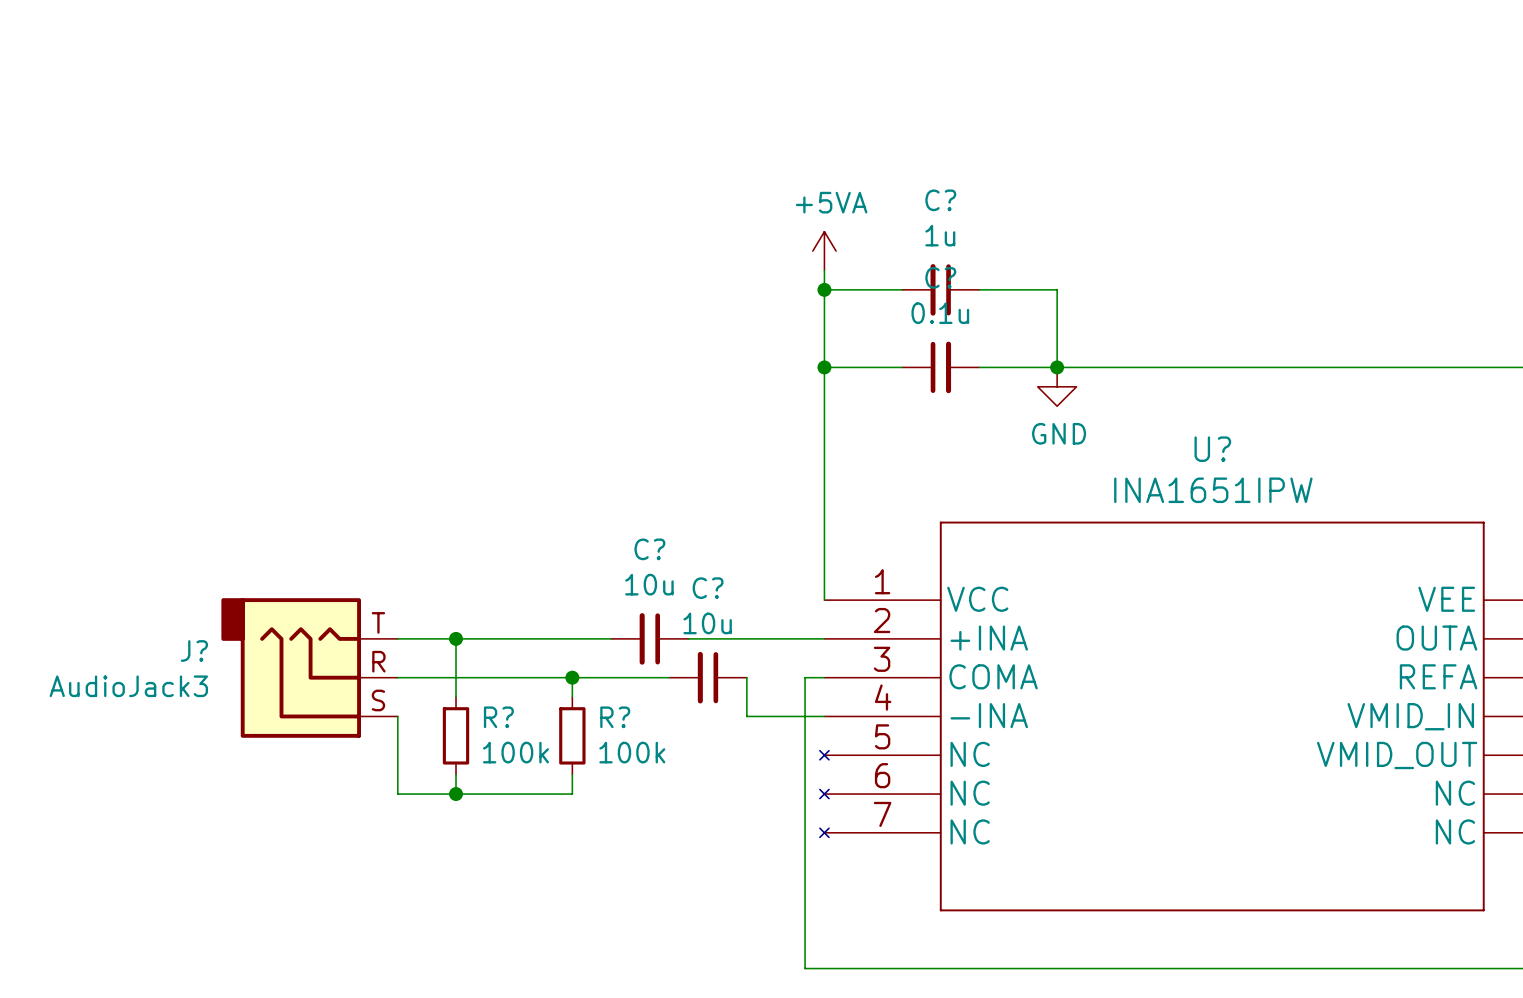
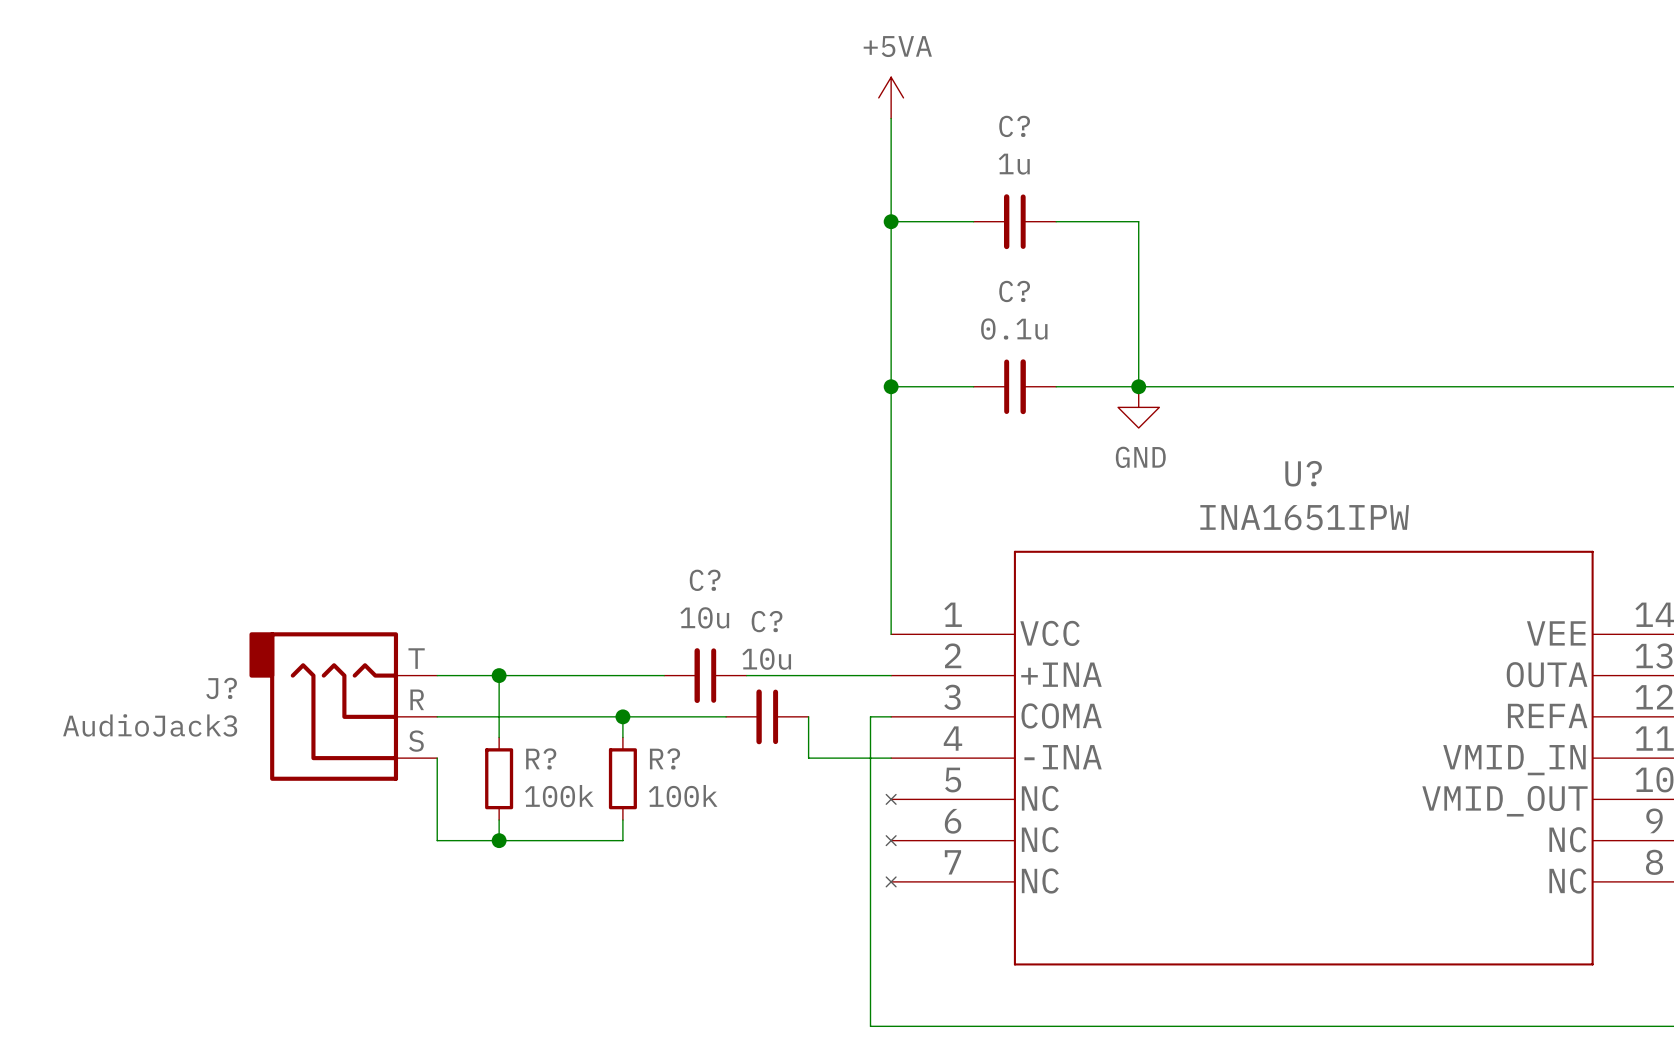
wire: none -> (891, 118) (891, 283)
power symbol position: +5VA (824, 251) -> +5VA (891, 97)
wire: (824, 289) (902, 289) -> (891, 221) (973, 221)
junction position: (824, 289) -> (891, 221)
C? position: (940, 289) -> (1014, 221)
wire: (979, 289) (1057, 289) -> (1056, 221) (1138, 221) (1138, 304)

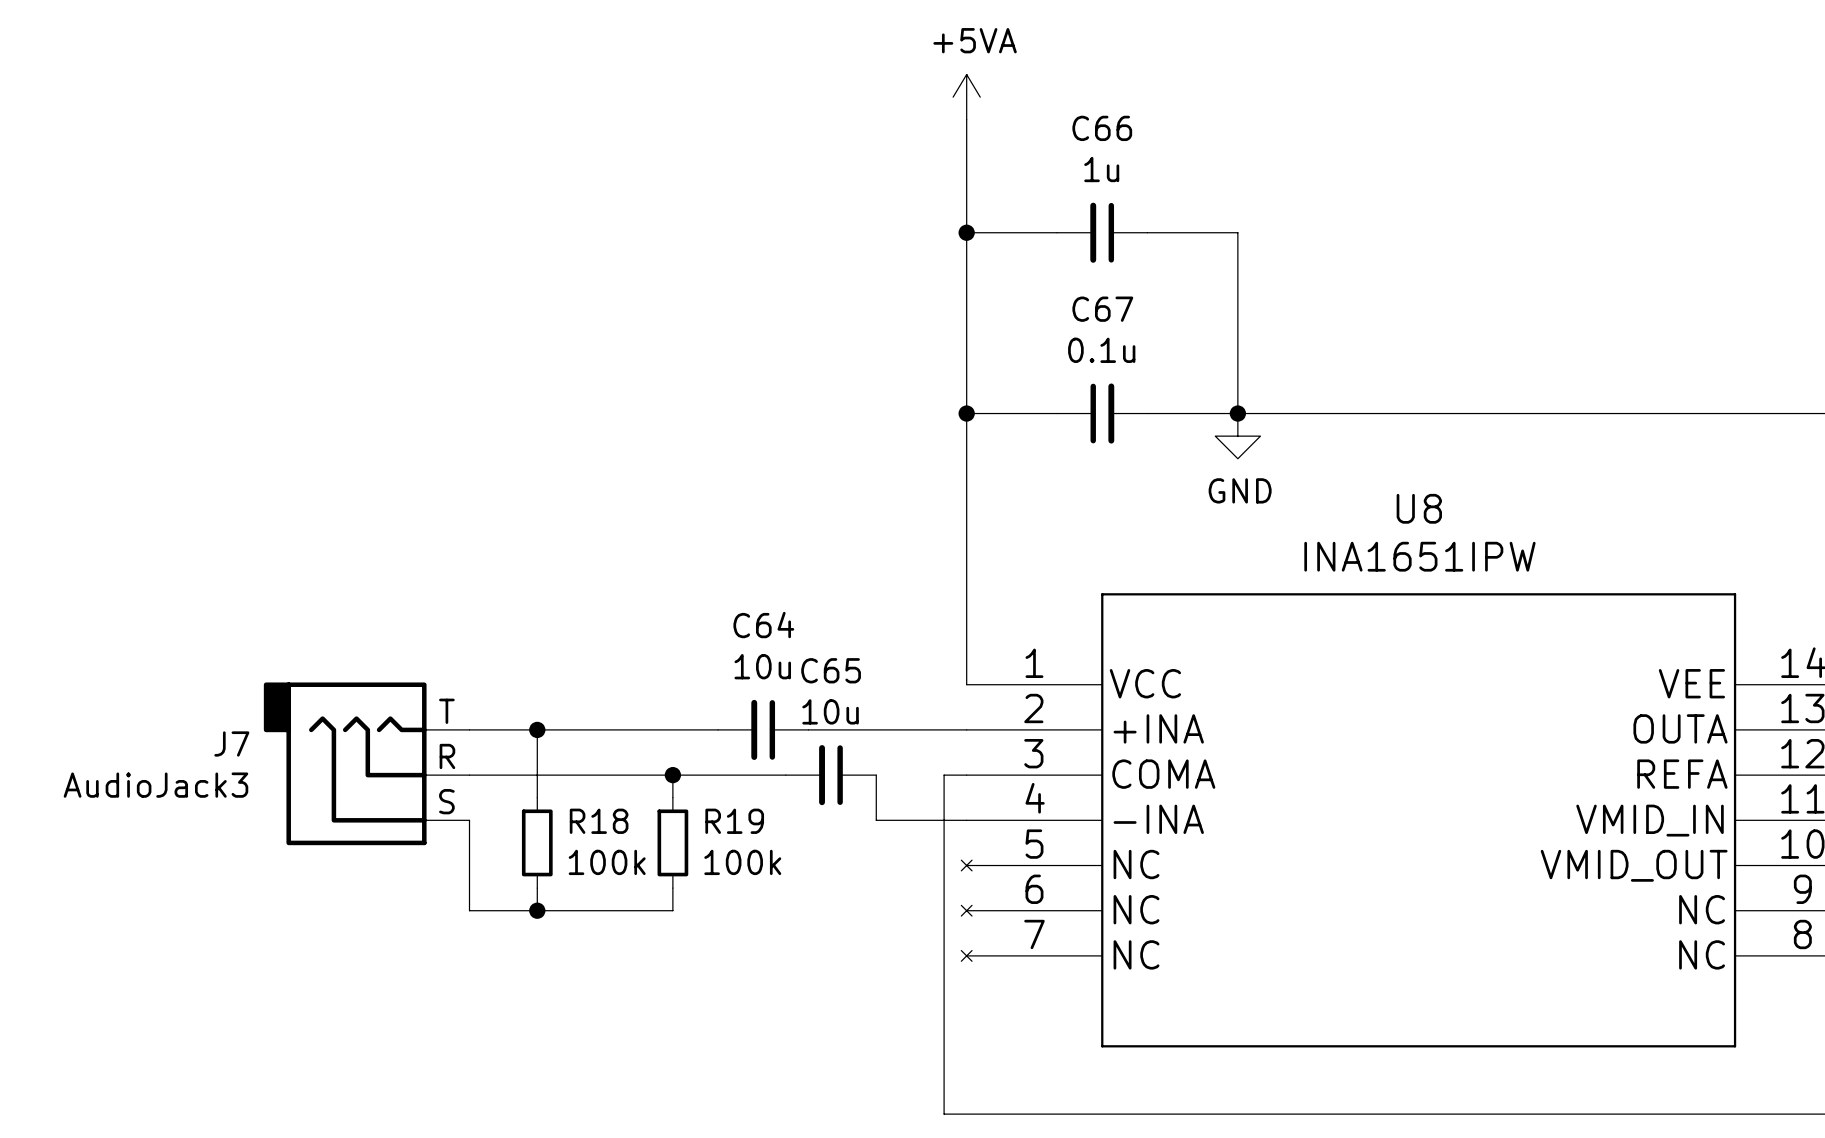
C? name: C? (1014, 126) -> C66 (1102, 128)
C? name: C? (1014, 291) -> C67 (1102, 309)
U? name: U? (1303, 473) -> U8 (1419, 508)
C? name: C? (705, 580) -> C64 (763, 625)
C? name: C? (767, 621) -> C65 (831, 670)
J? name: J? (221, 688) -> J7 (231, 743)
R? name: R? (541, 758) -> R18 (599, 821)
R? name: R? (665, 758) -> R19 (734, 821)

